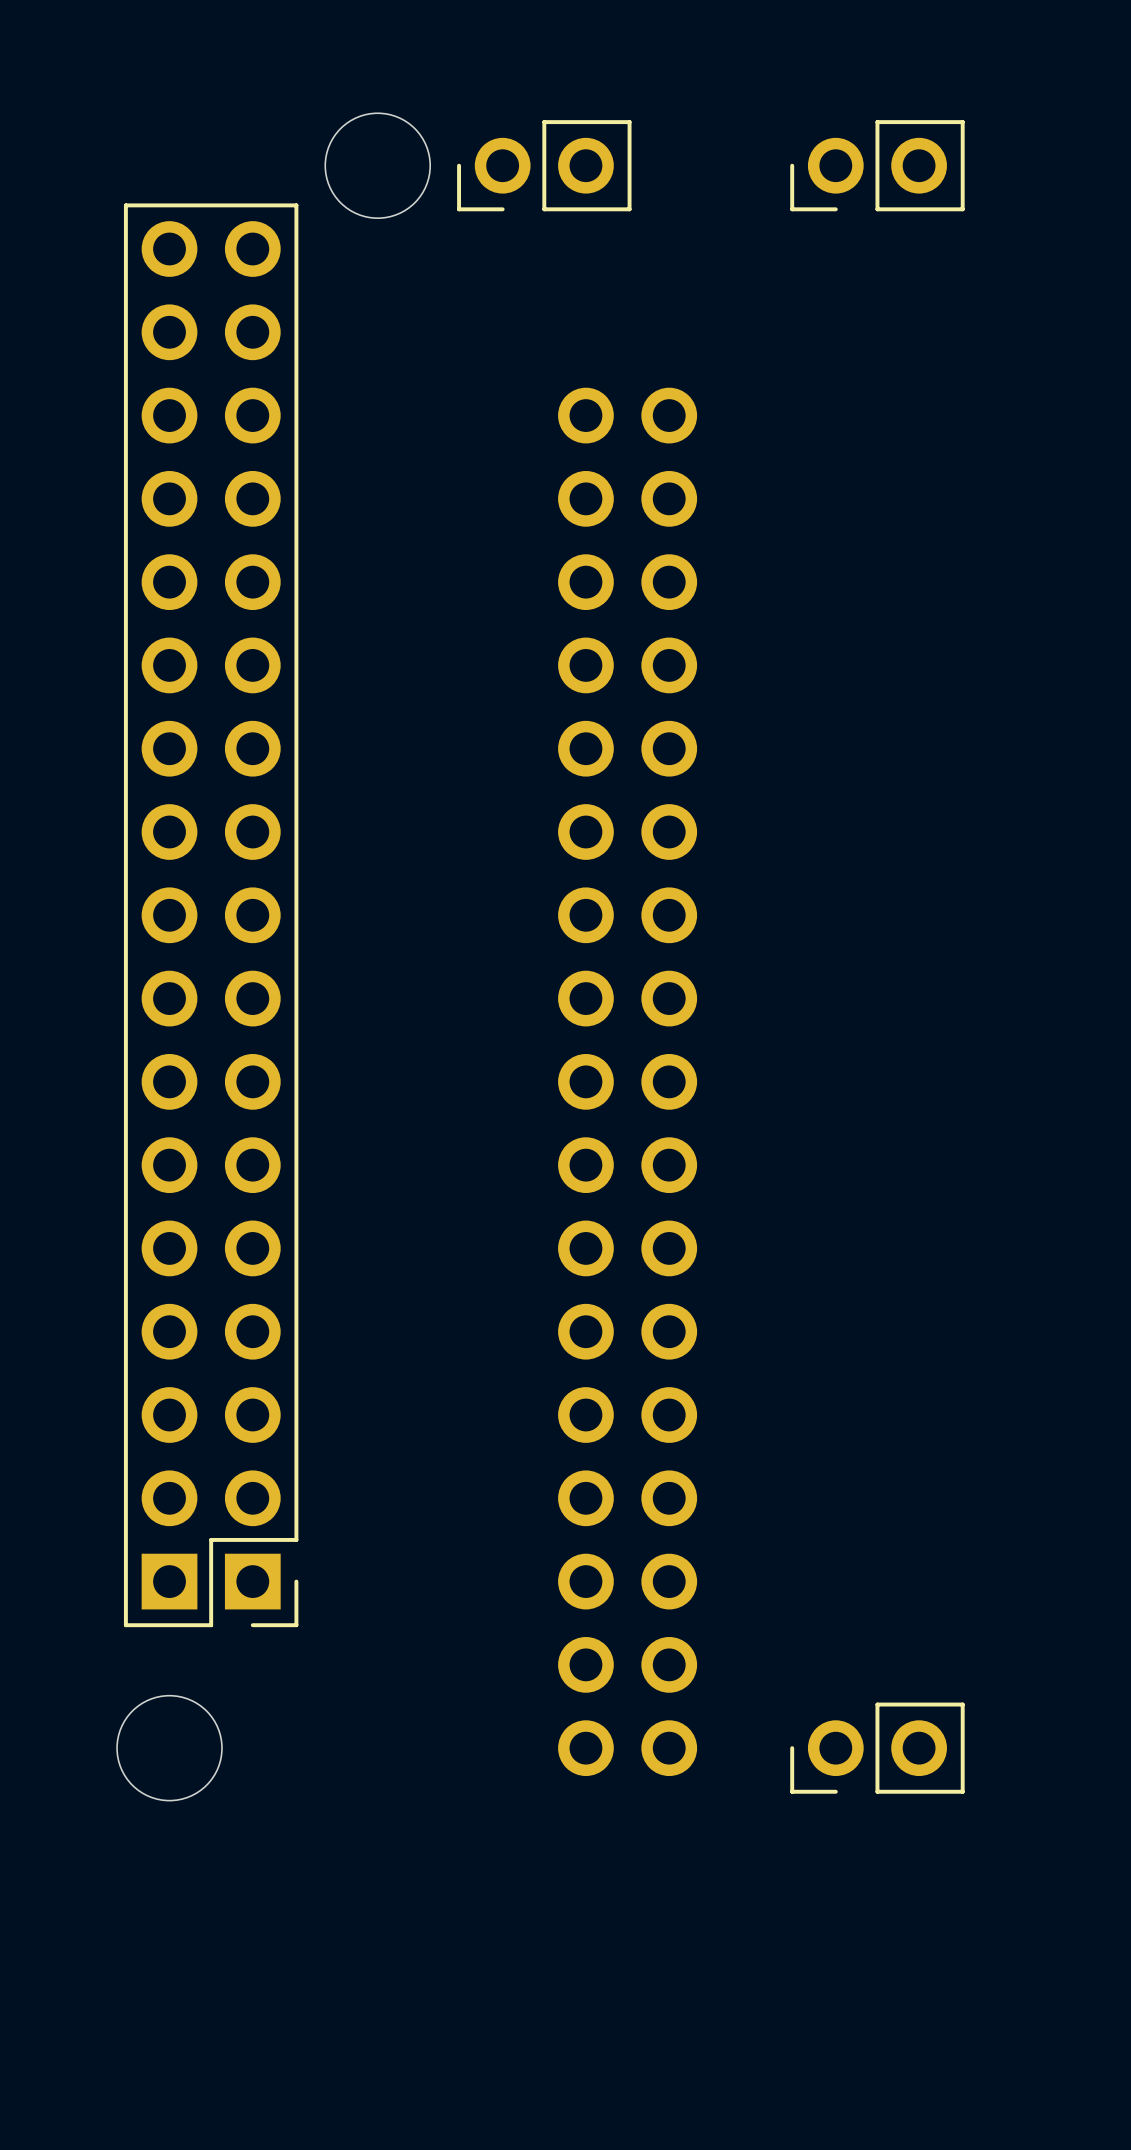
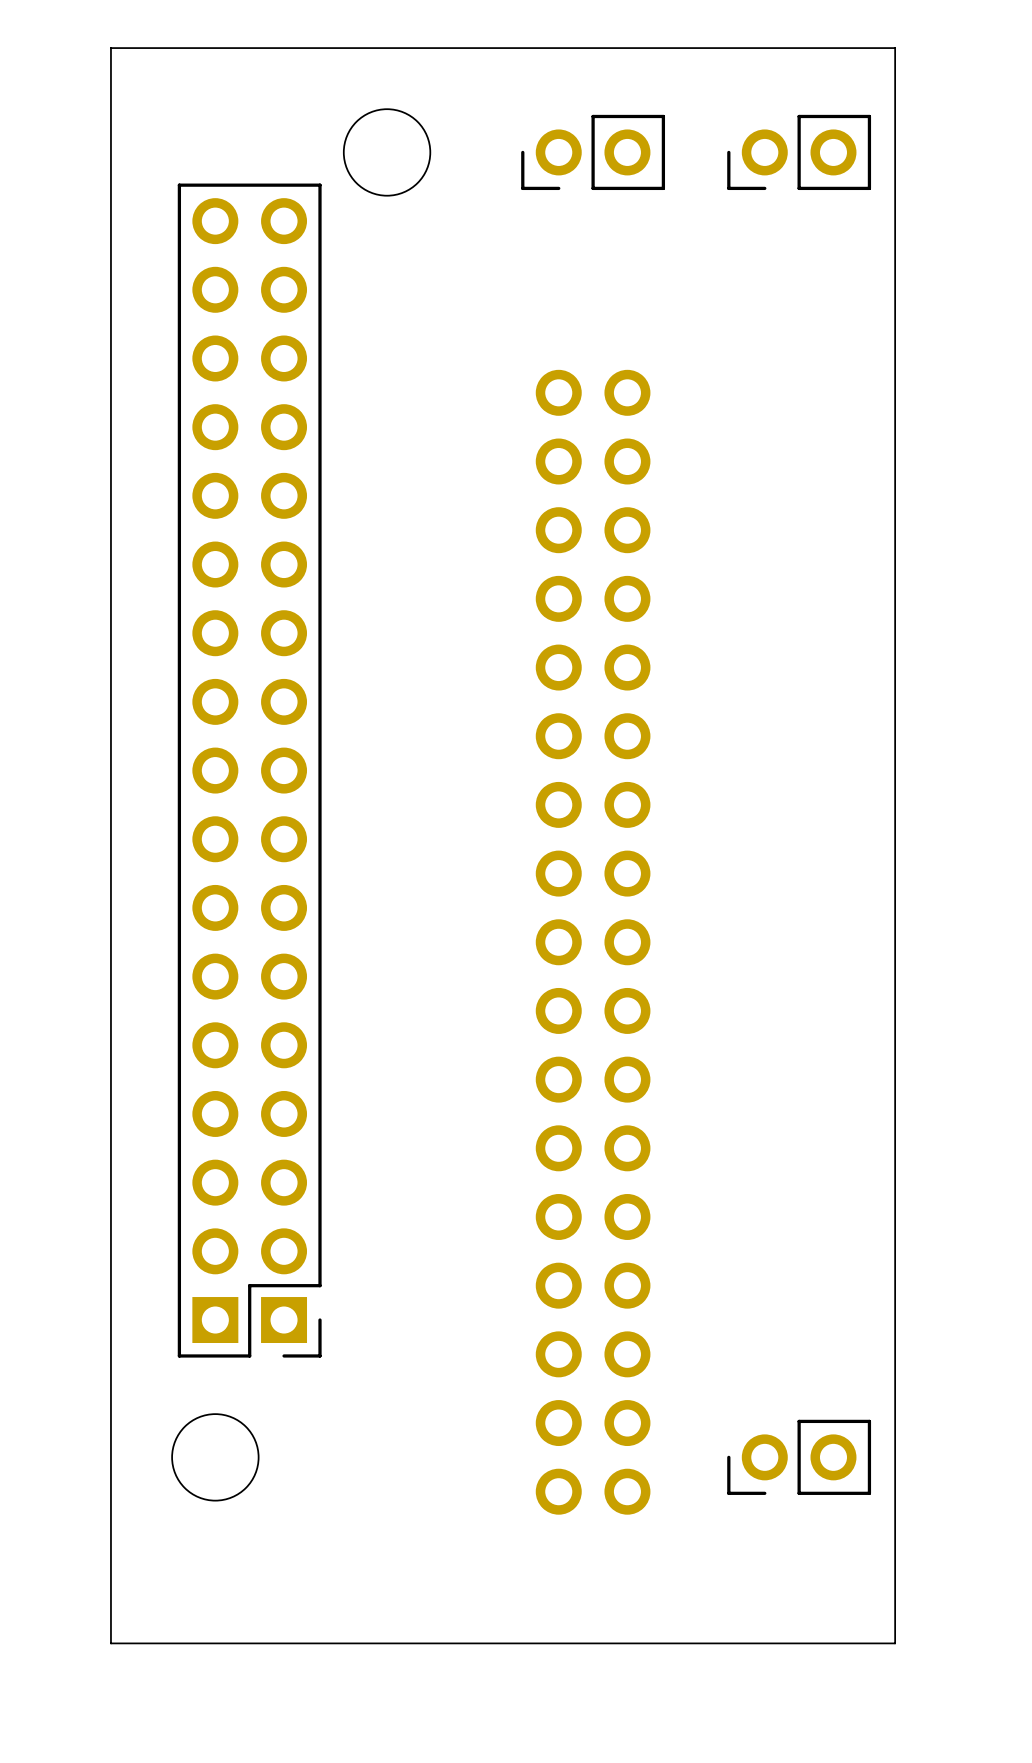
board edge: none -> (895, 48) (110, 48) (110, 1643) (895, 1643) (895, 48)
part position: (544, 165) -> (593, 152)
part position: (627, 1081) -> (593, 942)

